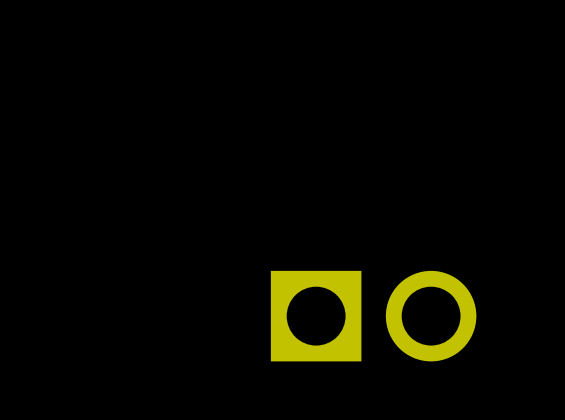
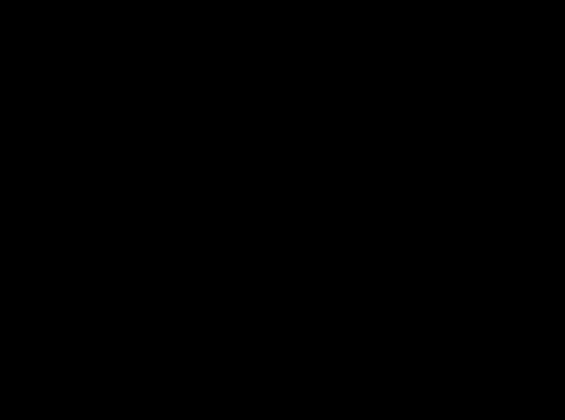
part: (373, 316) -> none

